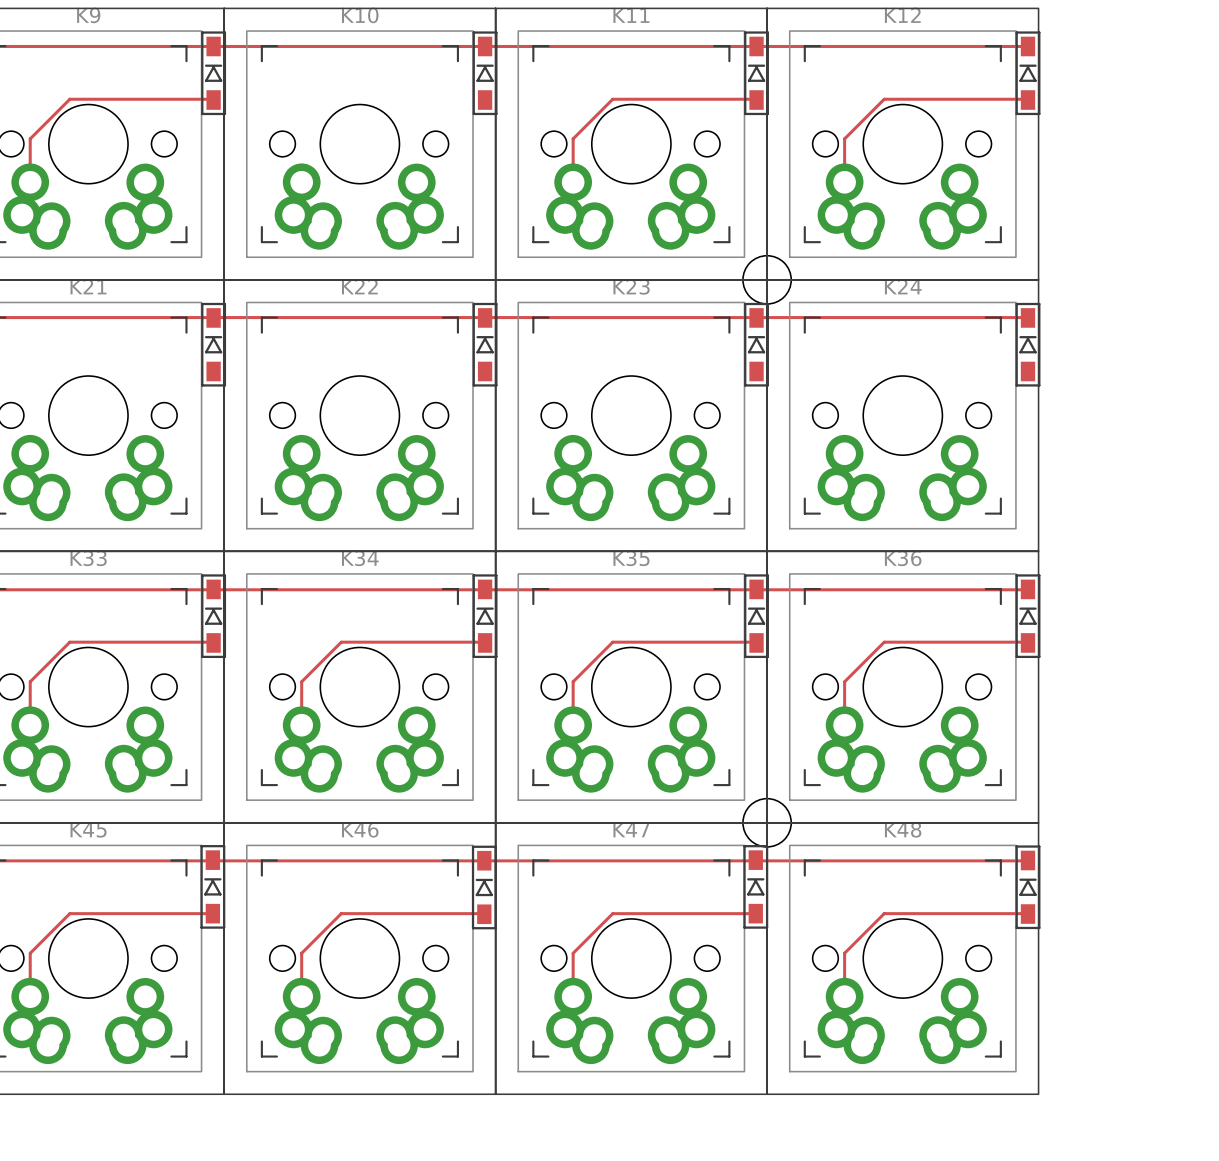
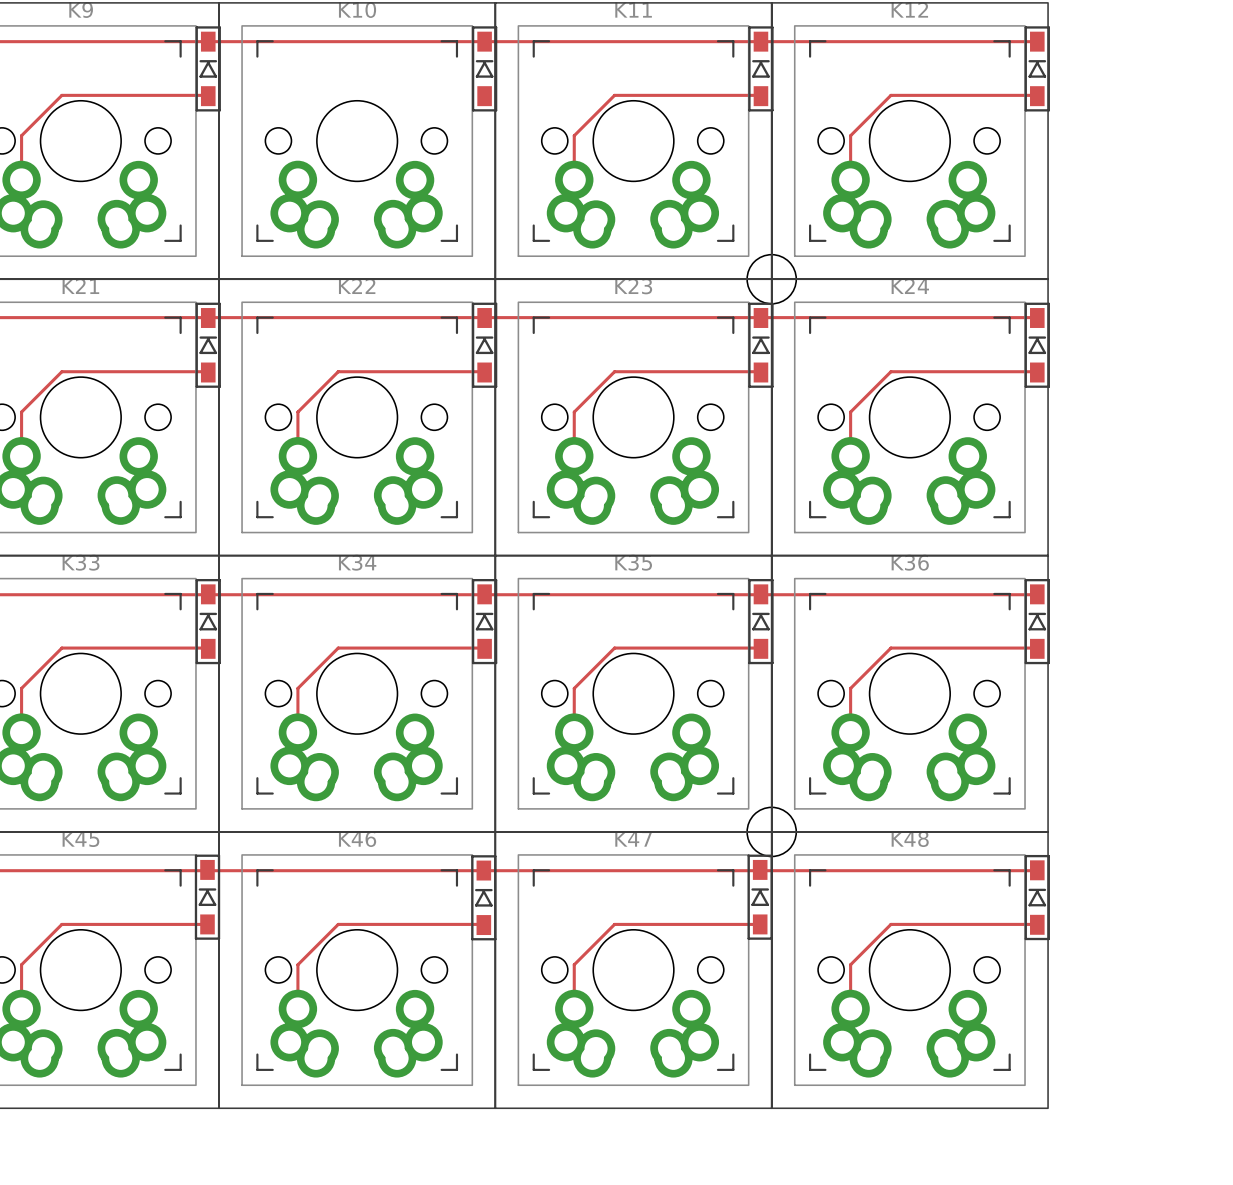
track: none -> (208, 372) (61, 371) (21, 412) (21, 456)
track: none -> (484, 372) (338, 371) (297, 412) (297, 456)
track: none -> (760, 372) (614, 371) (574, 412) (574, 456)
track: none -> (1037, 372) (890, 371) (850, 412) (850, 456)

